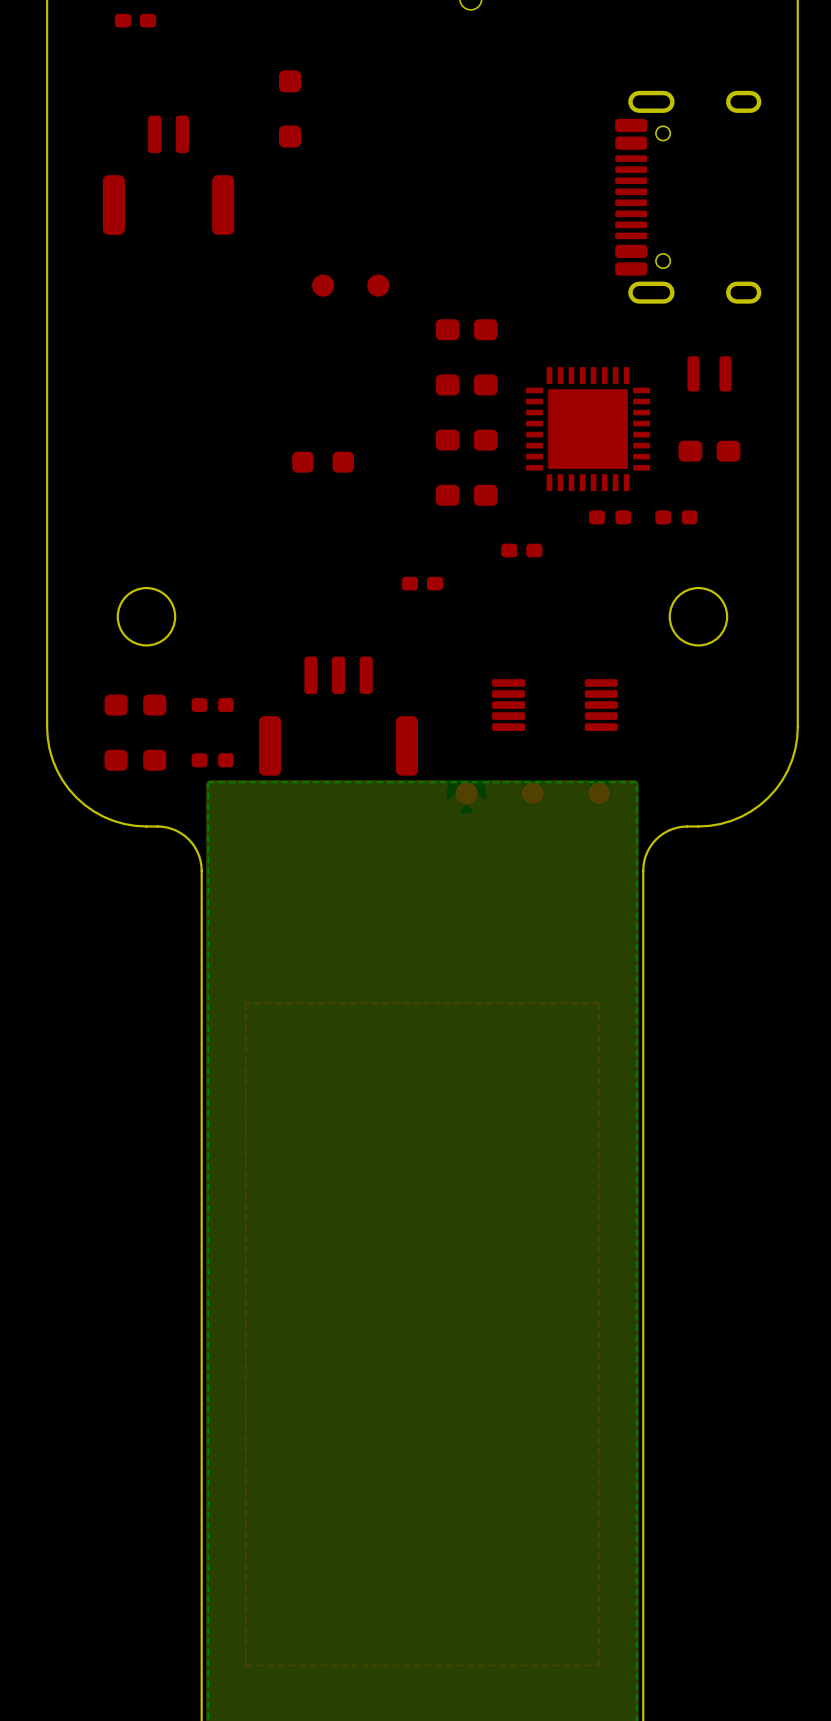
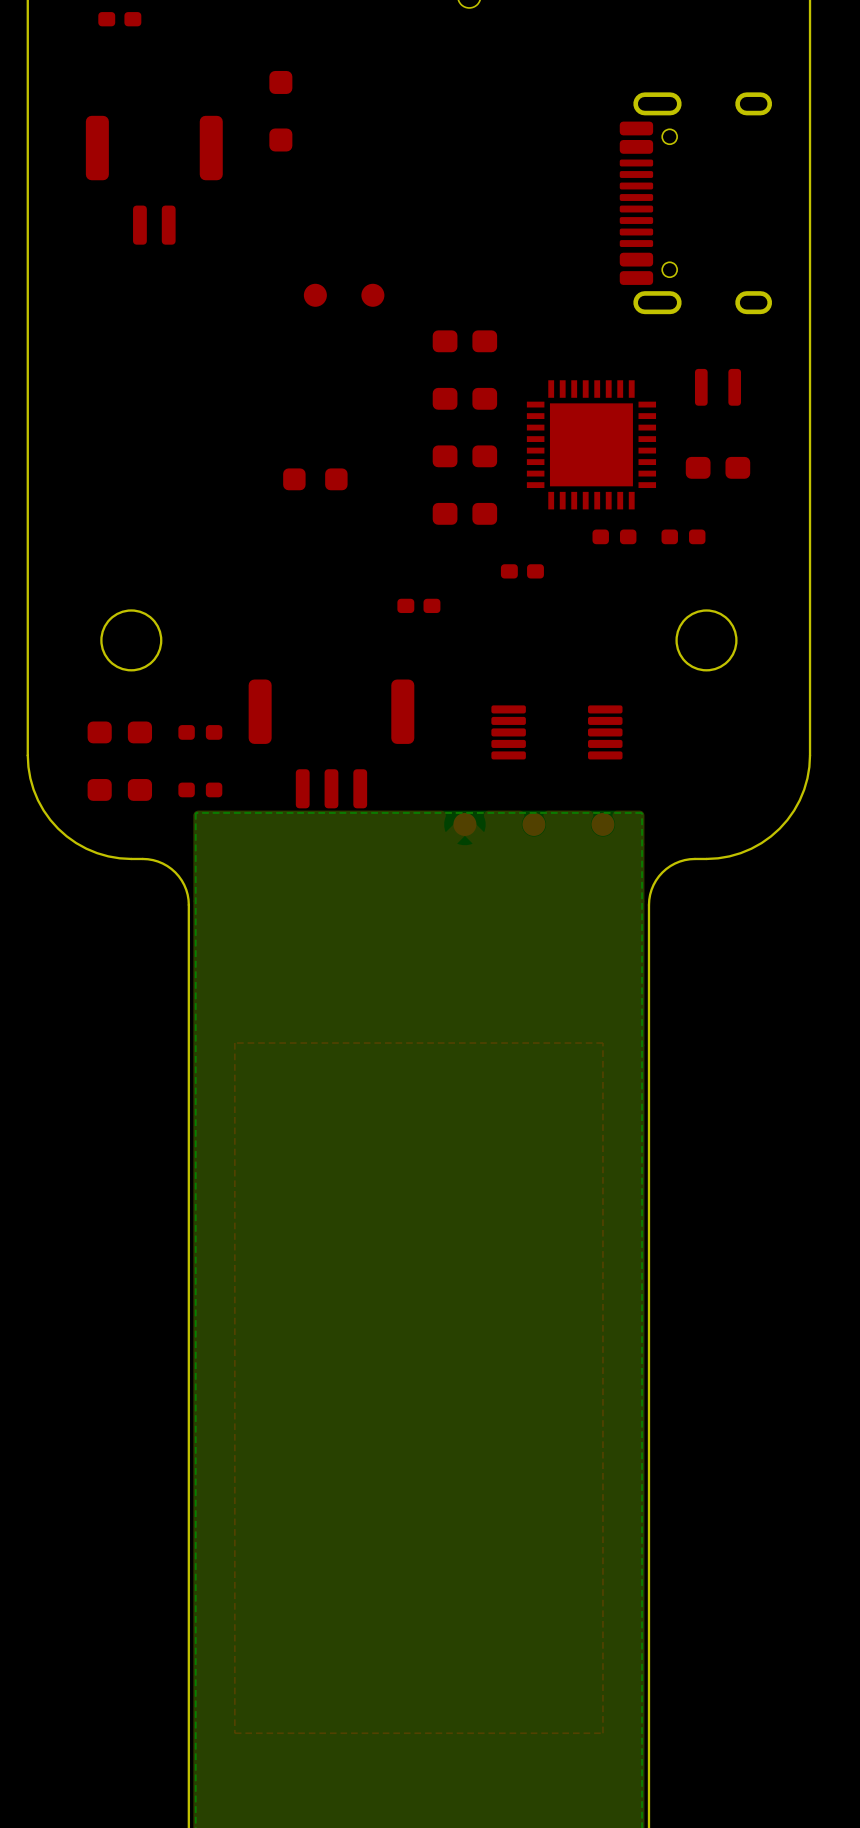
part footprint: [102, 115, 235, 235] -> [85, 115, 223, 245]
part footprint: [259, 656, 419, 776] -> [248, 679, 415, 809]

